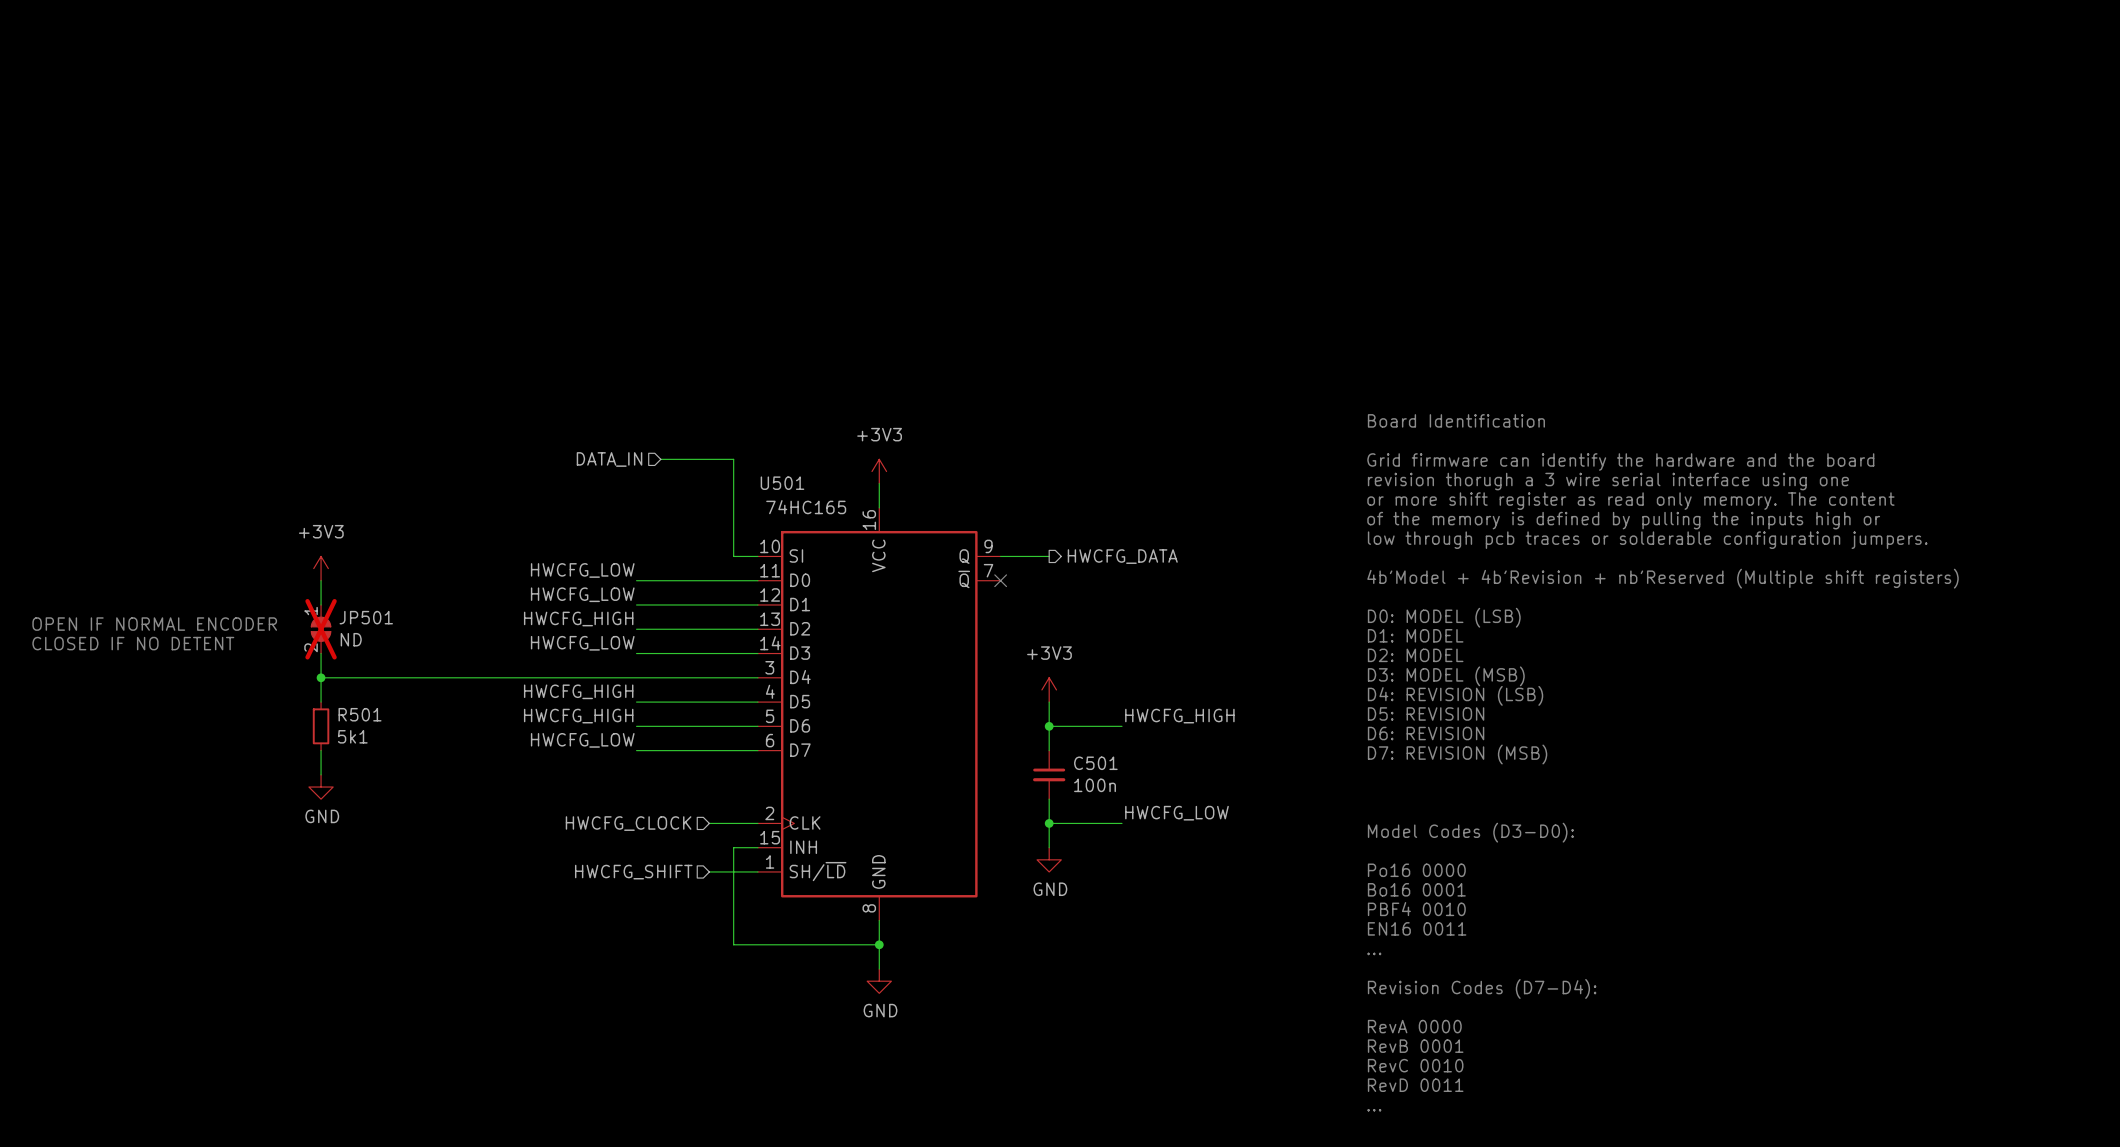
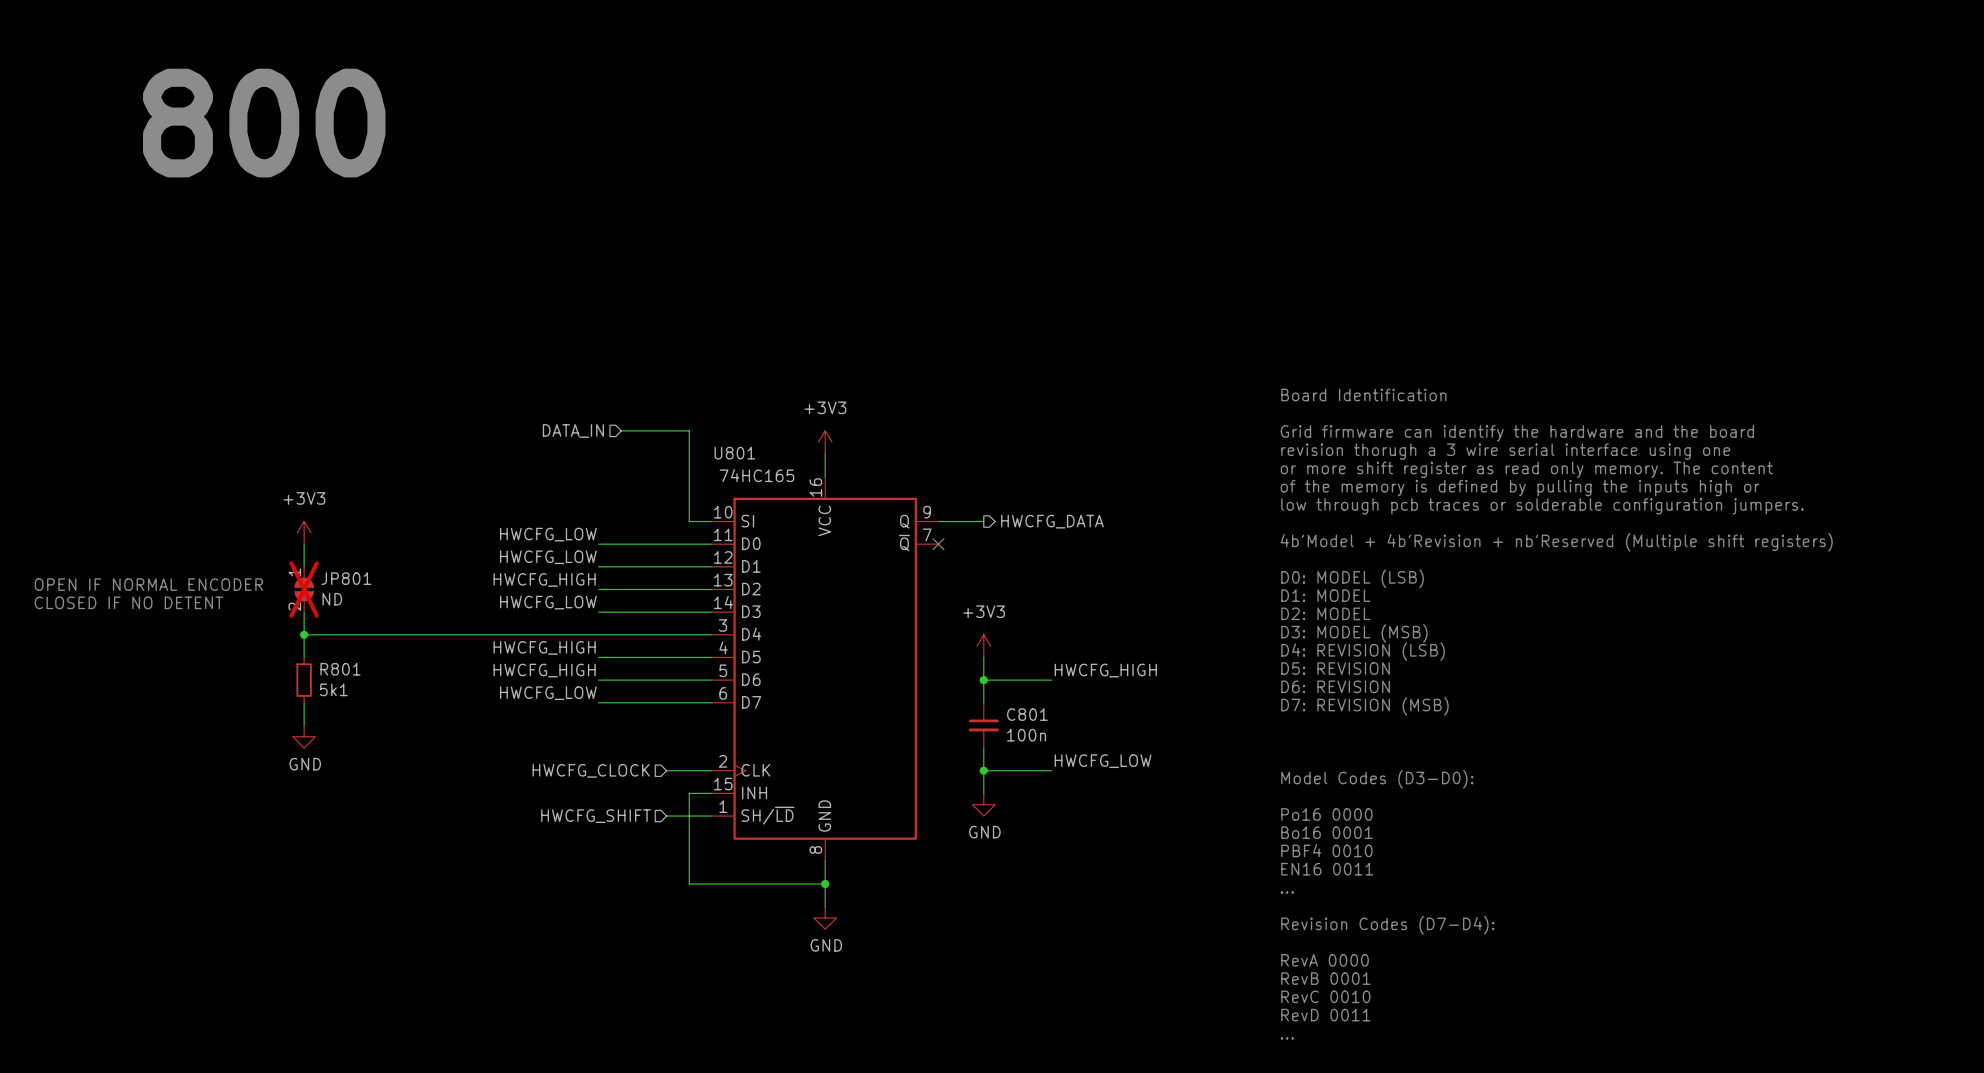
text: none -> 800 (264, 123)
U501 name: U501 (782, 483) -> U801 (734, 453)
JP501 name: JP501 (366, 617) -> JP801 (346, 578)
R501 name: R501 (360, 714) -> R801 (340, 669)
C501 name: C501 (1095, 763) -> C801 (1027, 714)

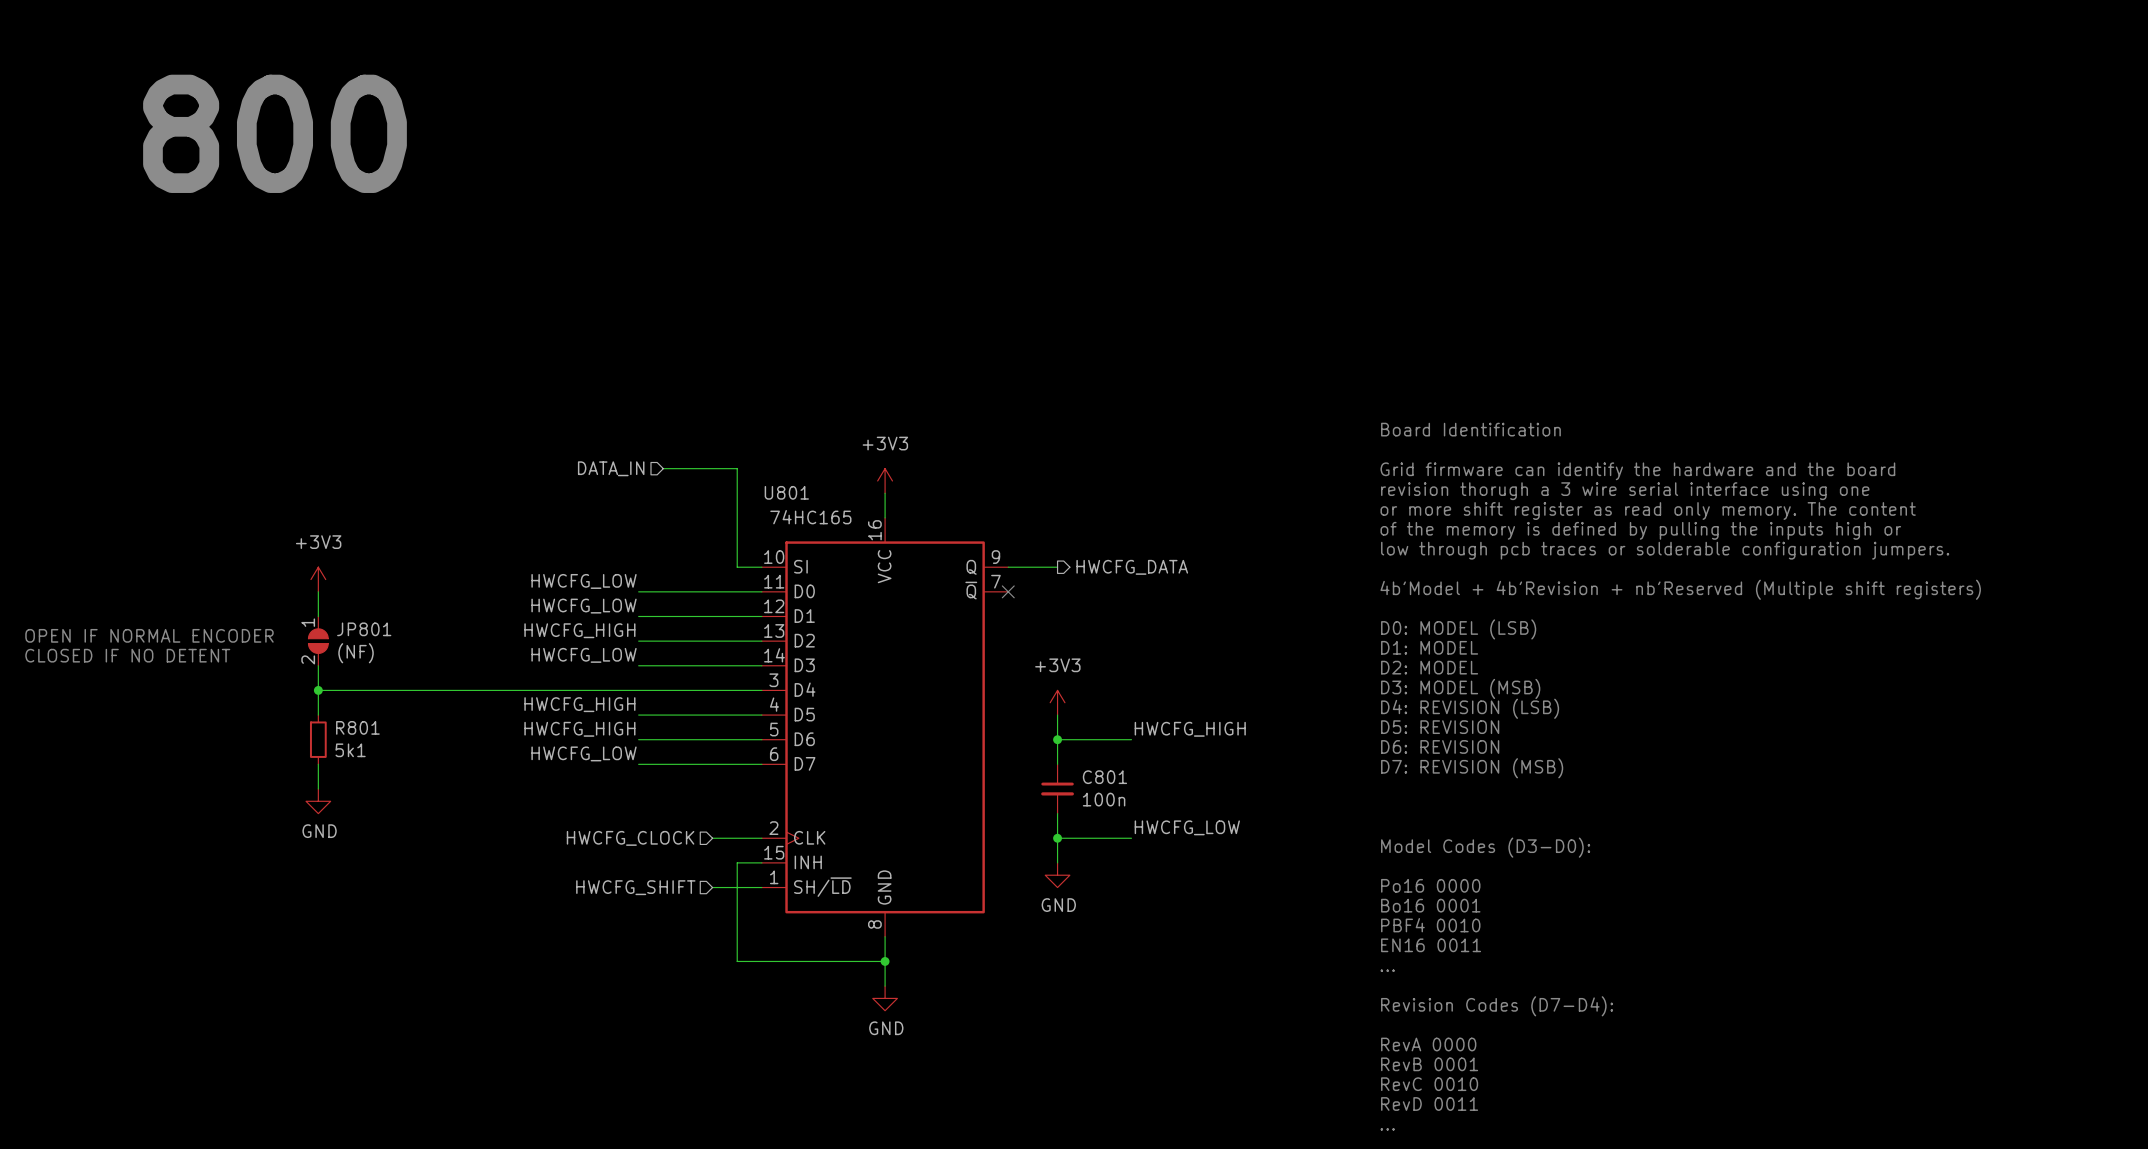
JP801 do-not-place cross: (304, 589) -> none
JP801 value: ND (332, 599) -> (NF) (356, 653)

